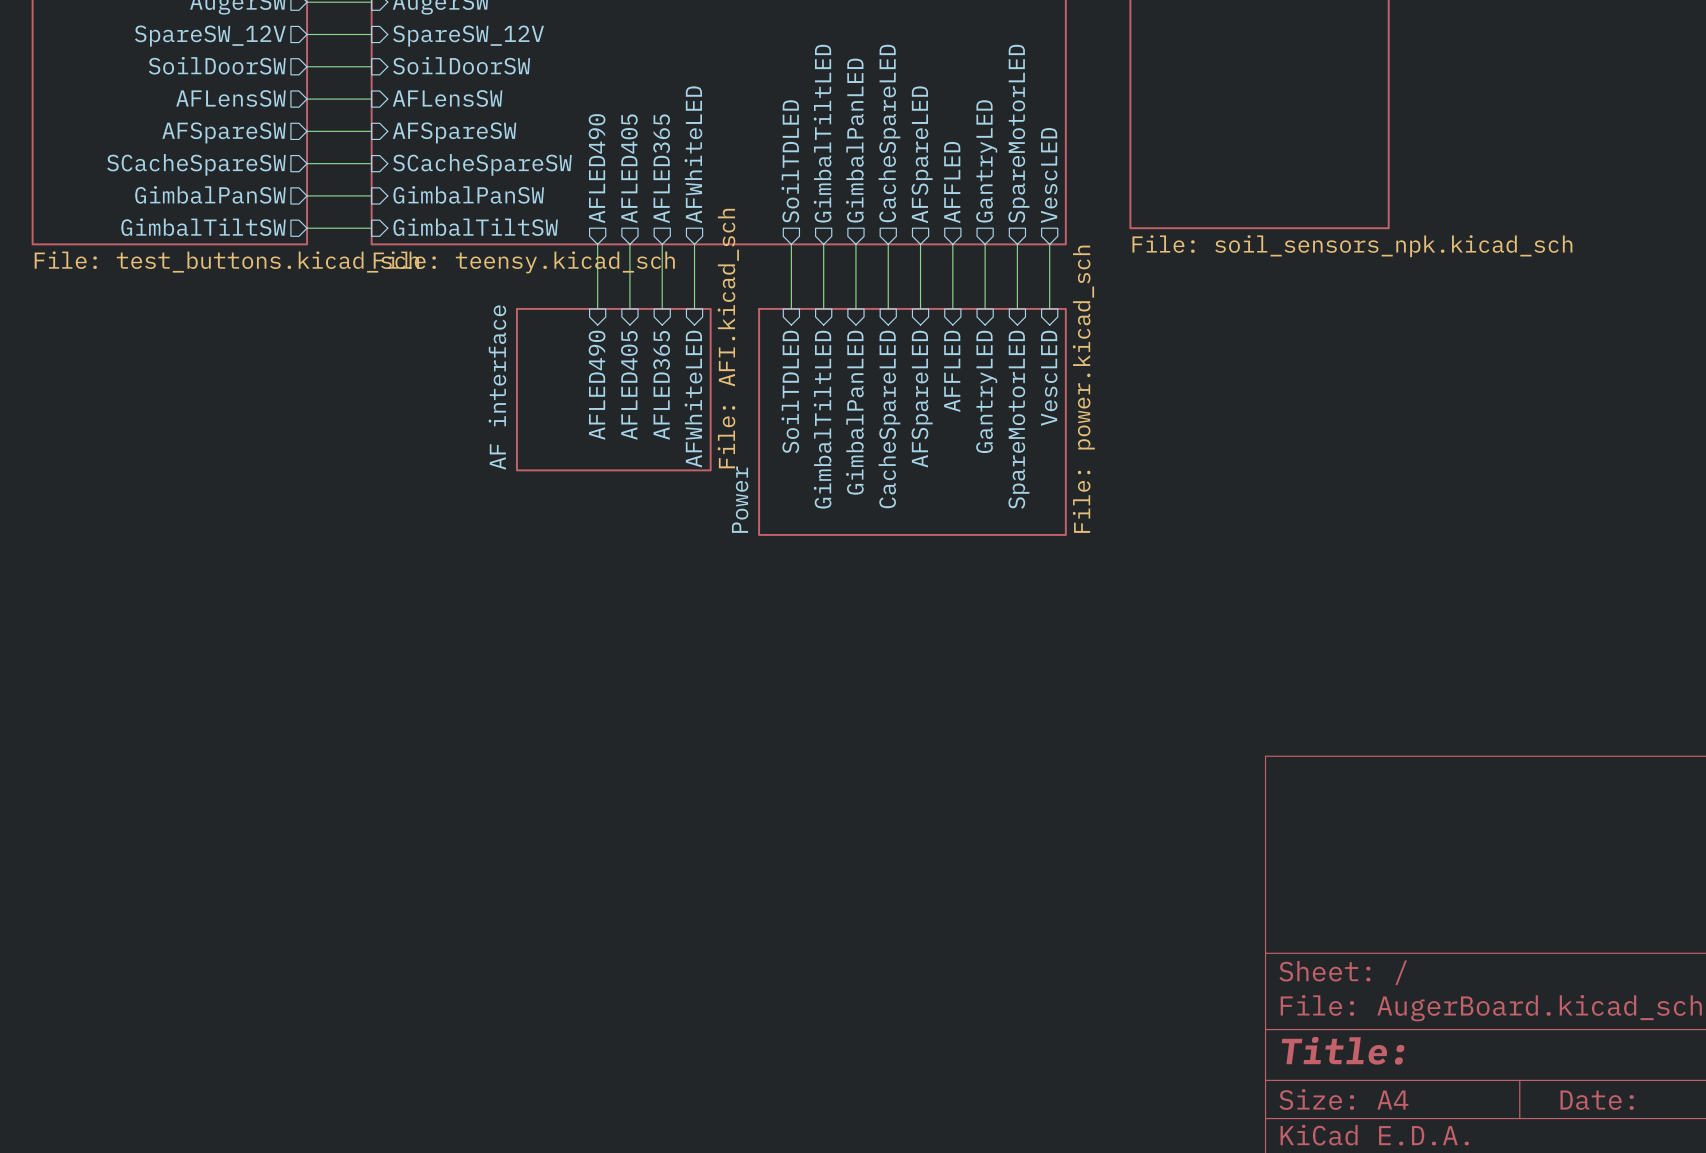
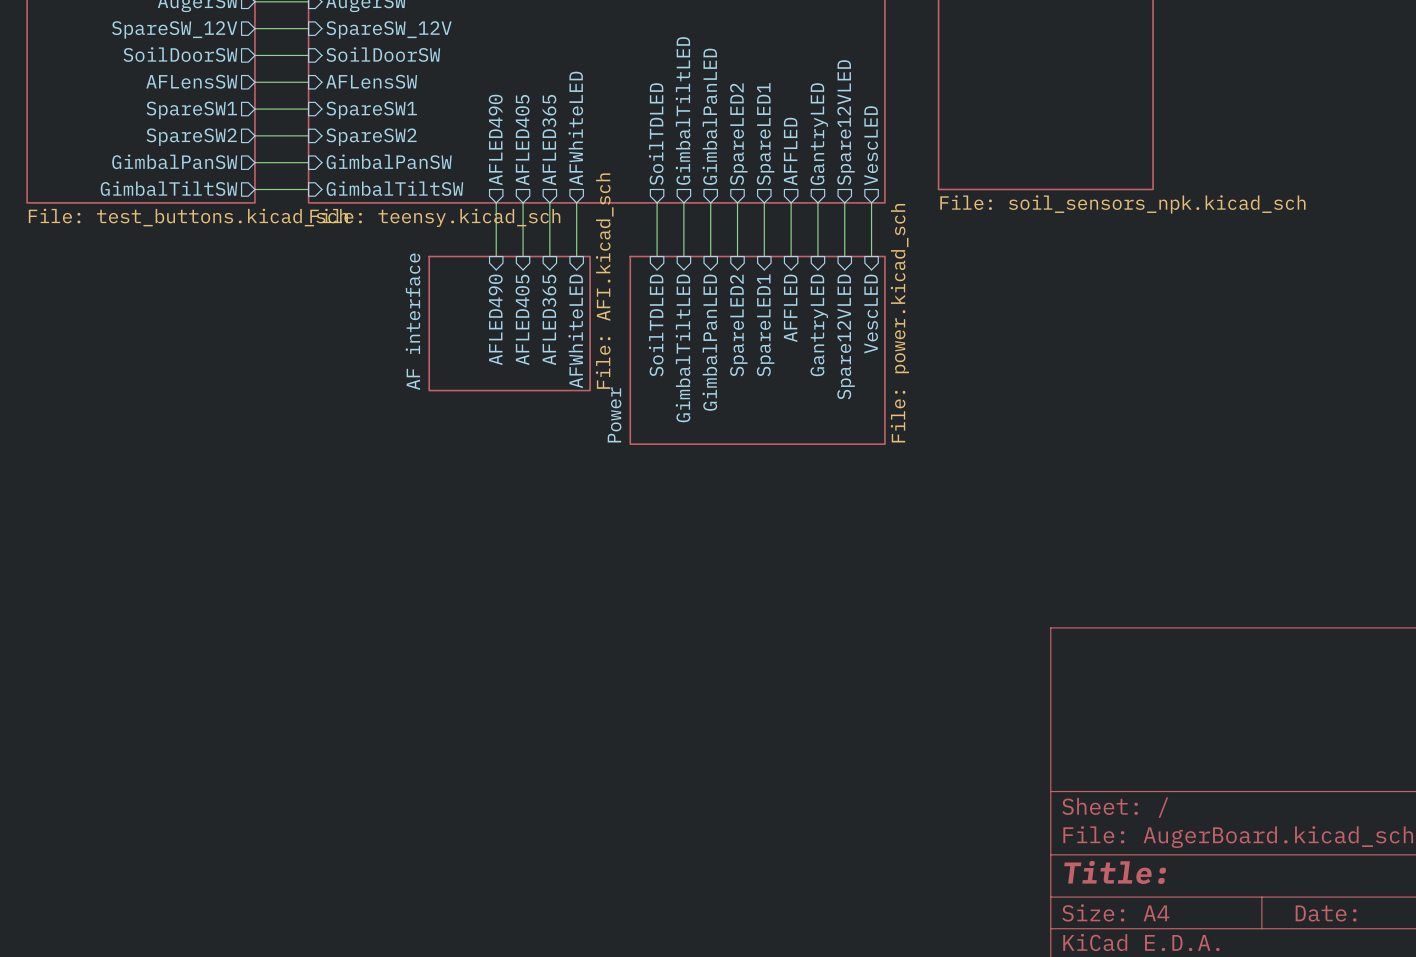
sheet pin: AFSpareSW (224, 132) -> SpareSW1 (191, 110)
sheet pin: AFSpareSW (454, 132) -> SpareSW1 (371, 110)
sheet pin: CacheSpareLED (889, 133) -> SpareLED2 (738, 134)
sheet pin: SpareMotorLED (1018, 133) -> Spare12VLED (846, 122)
sheet pin: AFSpareLED (922, 154) -> SpareLED1 (765, 134)
sheet pin: SCacheSpareSW (196, 164) -> SpareSW2 (191, 137)
sheet pin: SCacheSpareSW (482, 164) -> SpareSW2 (371, 137)
sheet pin: AFSpareLED (922, 399) -> SpareLED1 (765, 325)
sheet pin: CacheSpareLED (889, 419) -> SpareLED2 (738, 325)
sheet pin: SpareMotorLED (1018, 419) -> Spare12VLED (846, 337)

